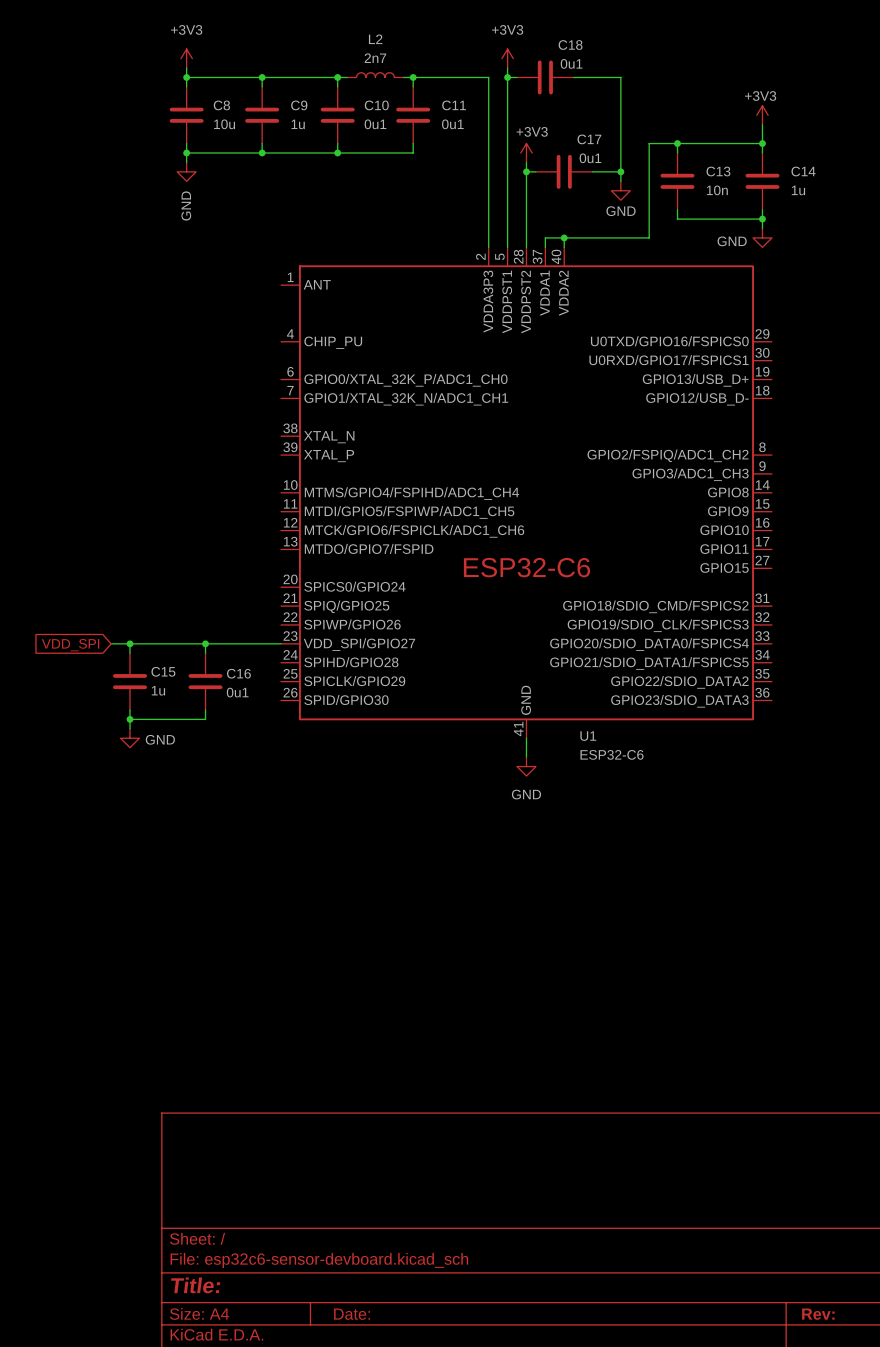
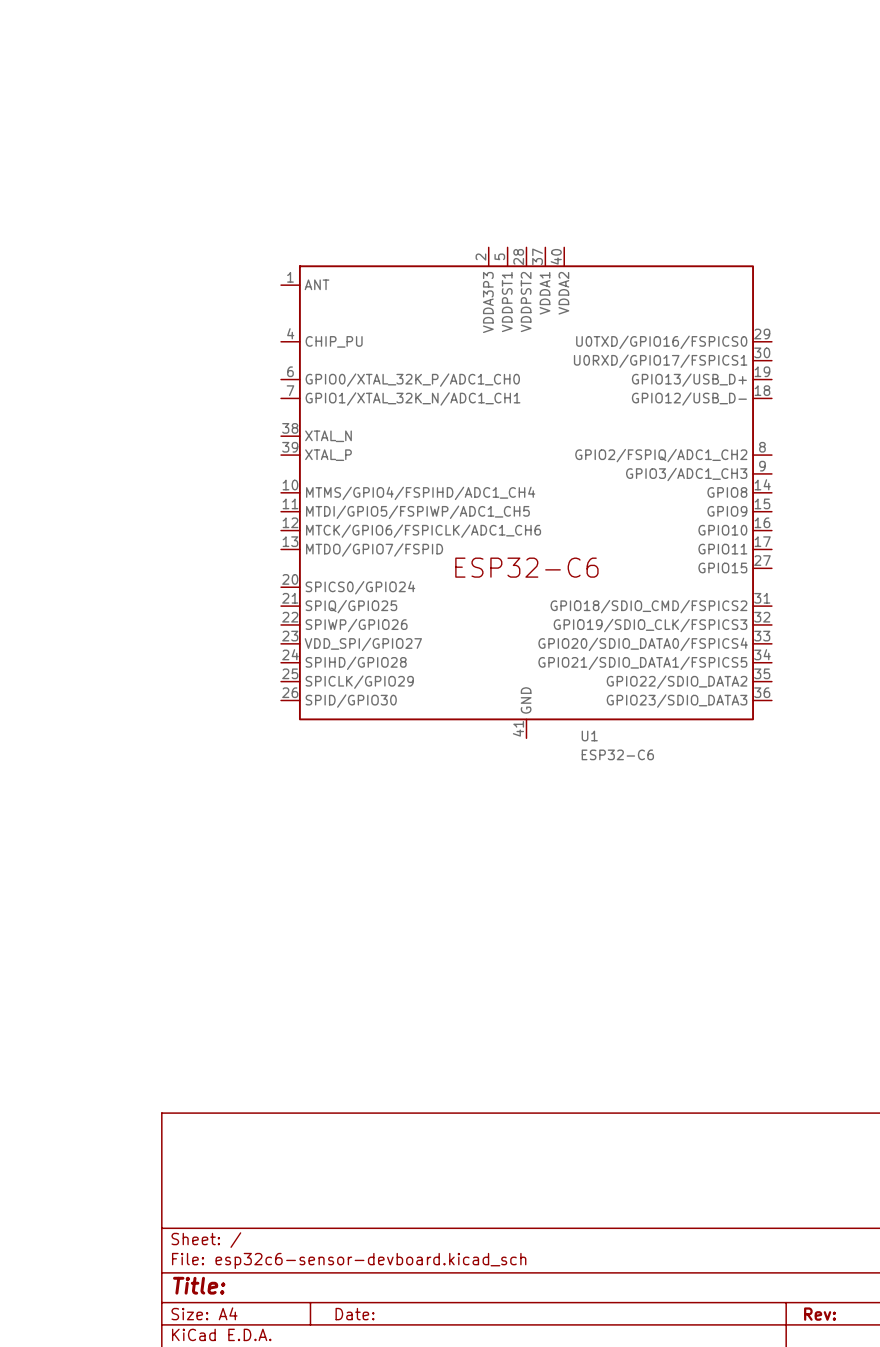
power symbol: +3V3 (186, 58) -> none
power symbol: +3V3 (507, 58) -> none
wire: (186, 68) (186, 86) -> none
wire: (507, 68) (507, 247) -> none
L2: 2n7 (375, 75) -> none
wire: (186, 77) (347, 77) -> none
junction: (186, 77) -> none
wire: (262, 77) (262, 86) -> none
junction: (262, 77) -> none
wire: (337, 77) (337, 86) -> none
junction: (337, 77) -> none
wire: (403, 77) (488, 77) (488, 247) -> none
wire: (413, 77) (413, 86) -> none
junction: (413, 77) -> none
wire: (507, 77) (517, 77) -> none
junction: (507, 77) -> none
C18: 0u1 (545, 77) -> none
wire: (573, 77) (620, 77) (620, 181) -> none
C8: 10u (186, 115) -> none
C9: 1u (262, 115) -> none
C10: 0u1 (337, 115) -> none
C11: 0u1 (413, 115) -> none
power symbol: +3V3 (762, 115) -> none
wire: (762, 124) (762, 152) -> none
wire: (186, 143) (186, 162) -> none
wire: (262, 143) (262, 152) -> none
wire: (337, 143) (337, 152) -> none
wire: (413, 143) (413, 152) (186, 152) -> none
wire: (677, 143) (677, 152) -> none
junction: (677, 143) -> none
wire: (762, 143) (649, 143) (649, 237) (545, 237) (545, 247) -> none
junction: (762, 143) -> none
junction: (186, 152) -> none
junction: (262, 152) -> none
junction: (337, 152) -> none
power symbol: +3V3 (526, 152) -> none
wire: (526, 162) (526, 247) -> none
power symbol: GND (186, 171) -> none
wire: (526, 171) (535, 171) -> none
junction: (526, 171) -> none
C17: 0u1 (564, 171) -> none
wire: (592, 171) (620, 171) -> none
junction: (620, 171) -> none
C13: 10n (677, 181) -> none
C14: 1u (762, 181) -> none
power symbol: GND (620, 190) -> none
wire: (677, 209) (677, 219) (762, 219) -> none
wire: (762, 209) (762, 228) -> none
junction: (762, 219) -> none
wire: (564, 237) (564, 247) -> none
junction: (564, 237) -> none
power symbol: GND (762, 237) -> none
wire: (111, 643) (281, 643) -> none
wire: (130, 643) (130, 653) -> none
junction: (130, 643) -> none
wire: (205, 643) (205, 653) -> none
junction: (205, 643) -> none
global label: VDD_SPI (70, 645) -> none
C15: 1u (130, 681) -> none
C16: 0u1 (205, 681) -> none
wire: (130, 709) (130, 728) -> none
wire: (205, 709) (205, 719) (130, 719) -> none
junction: (130, 719) -> none
power symbol: GND (130, 738) -> none
wire: (526, 738) (526, 757) -> none
power symbol: GND (526, 766) -> none

